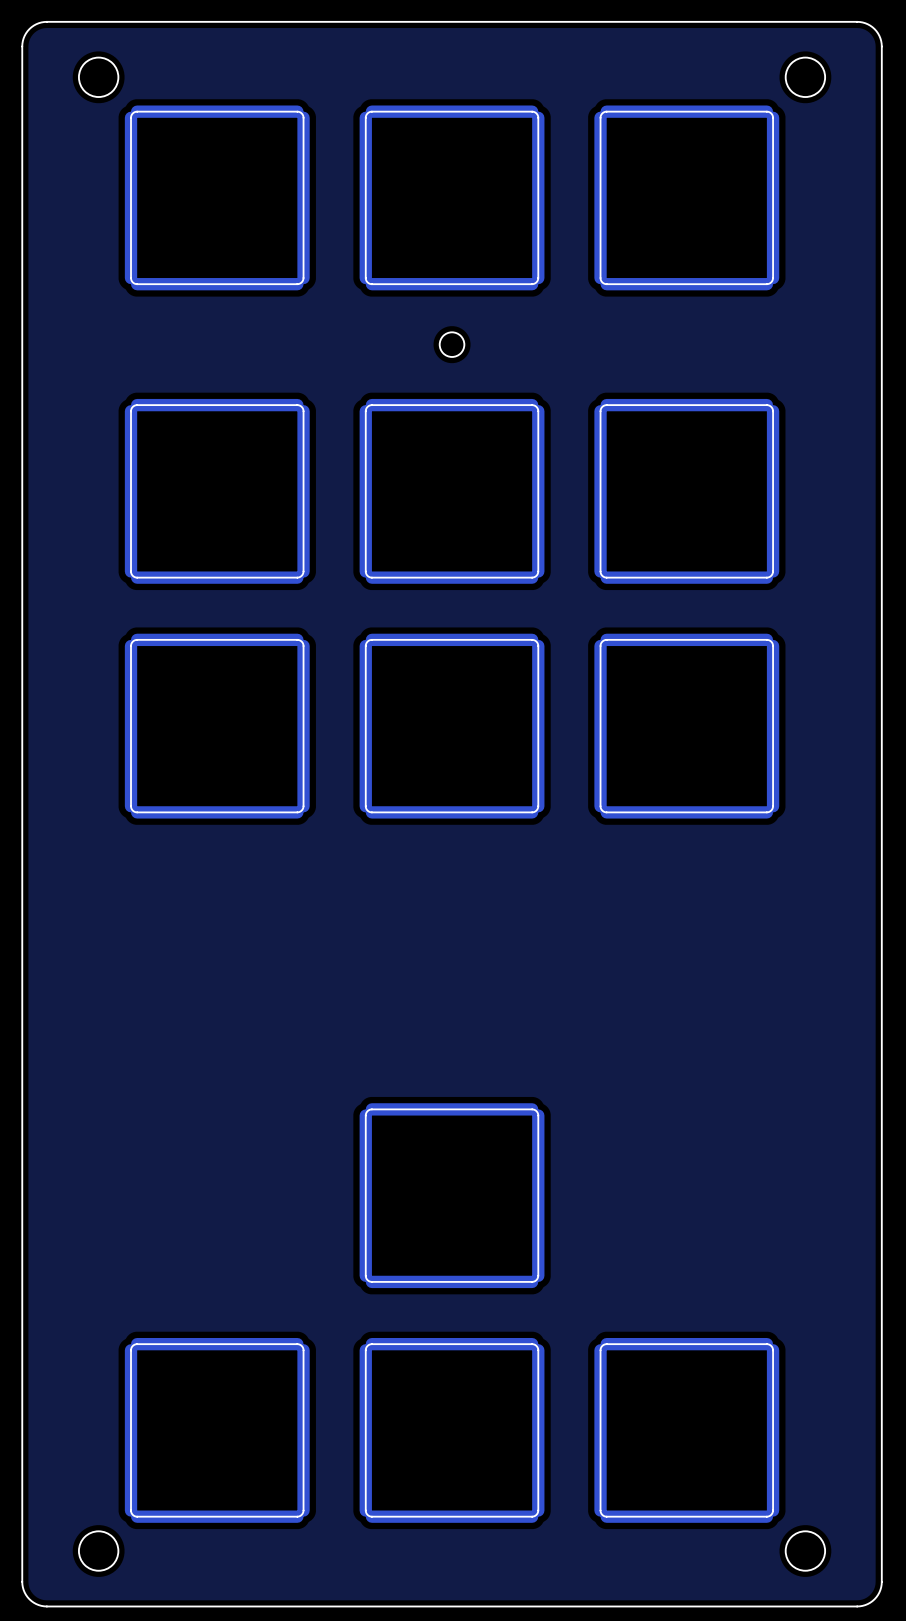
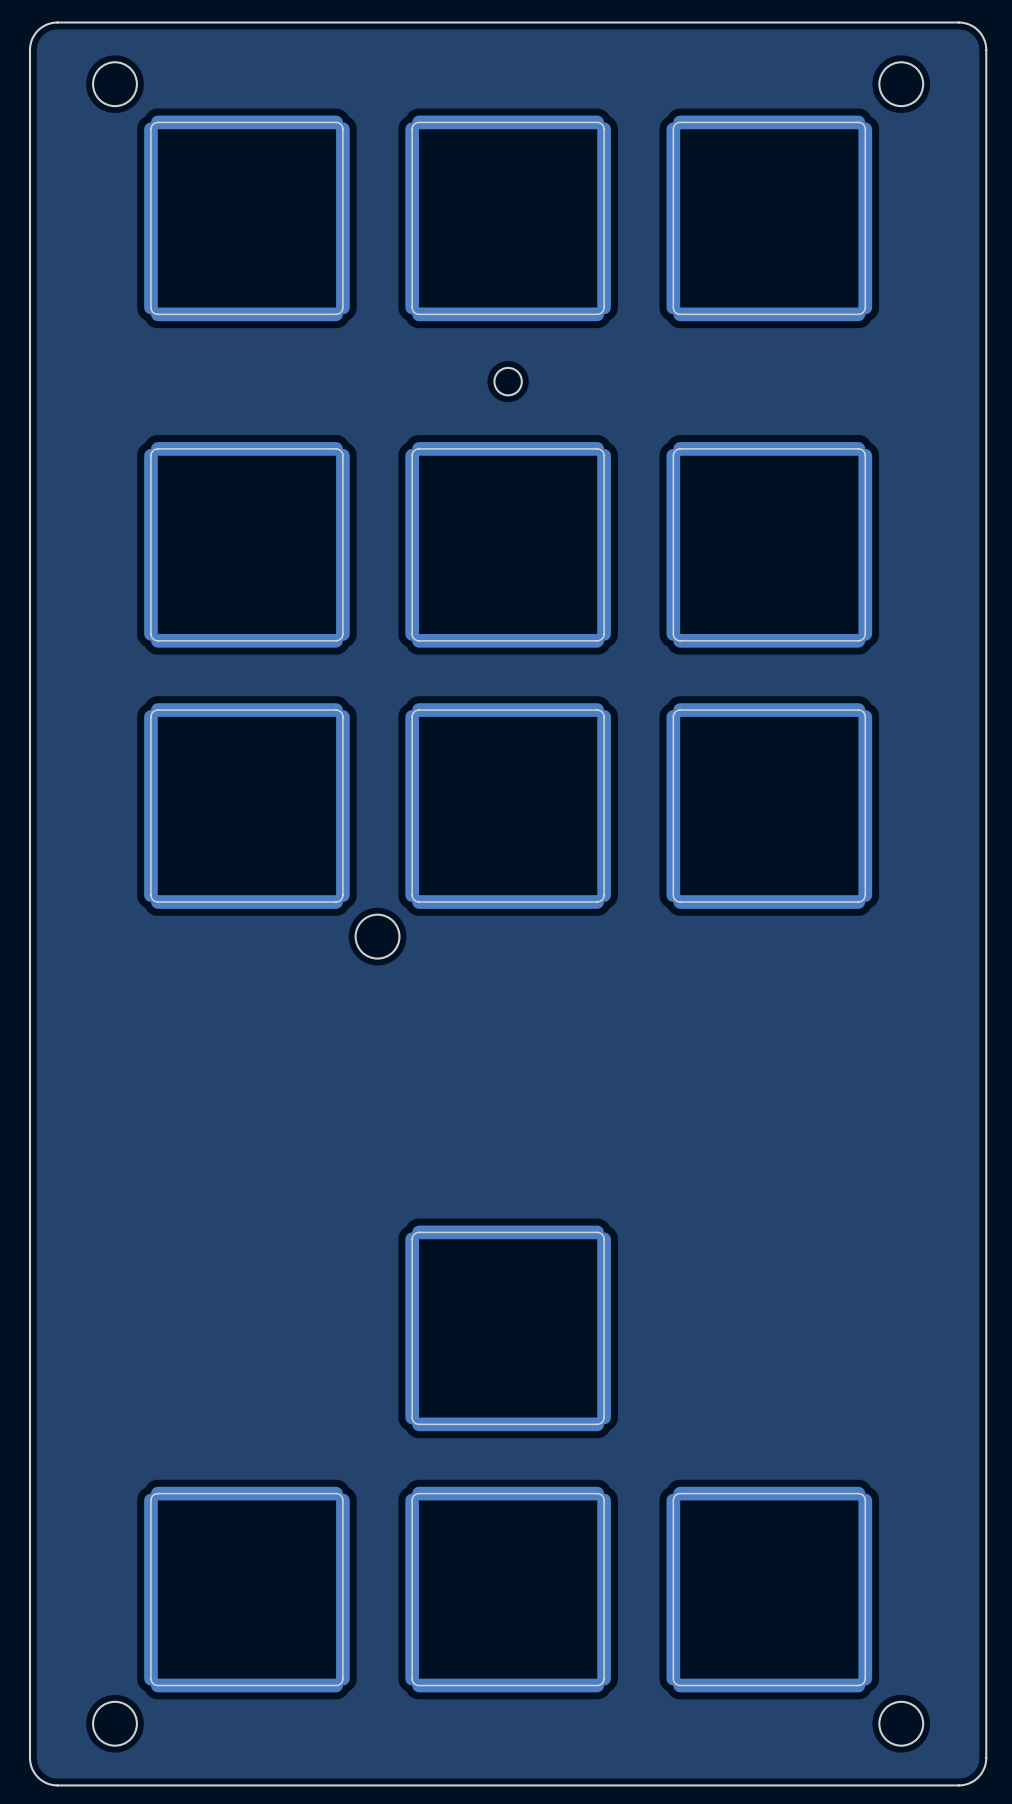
round board edge: none -> [354, 913, 401, 960]

